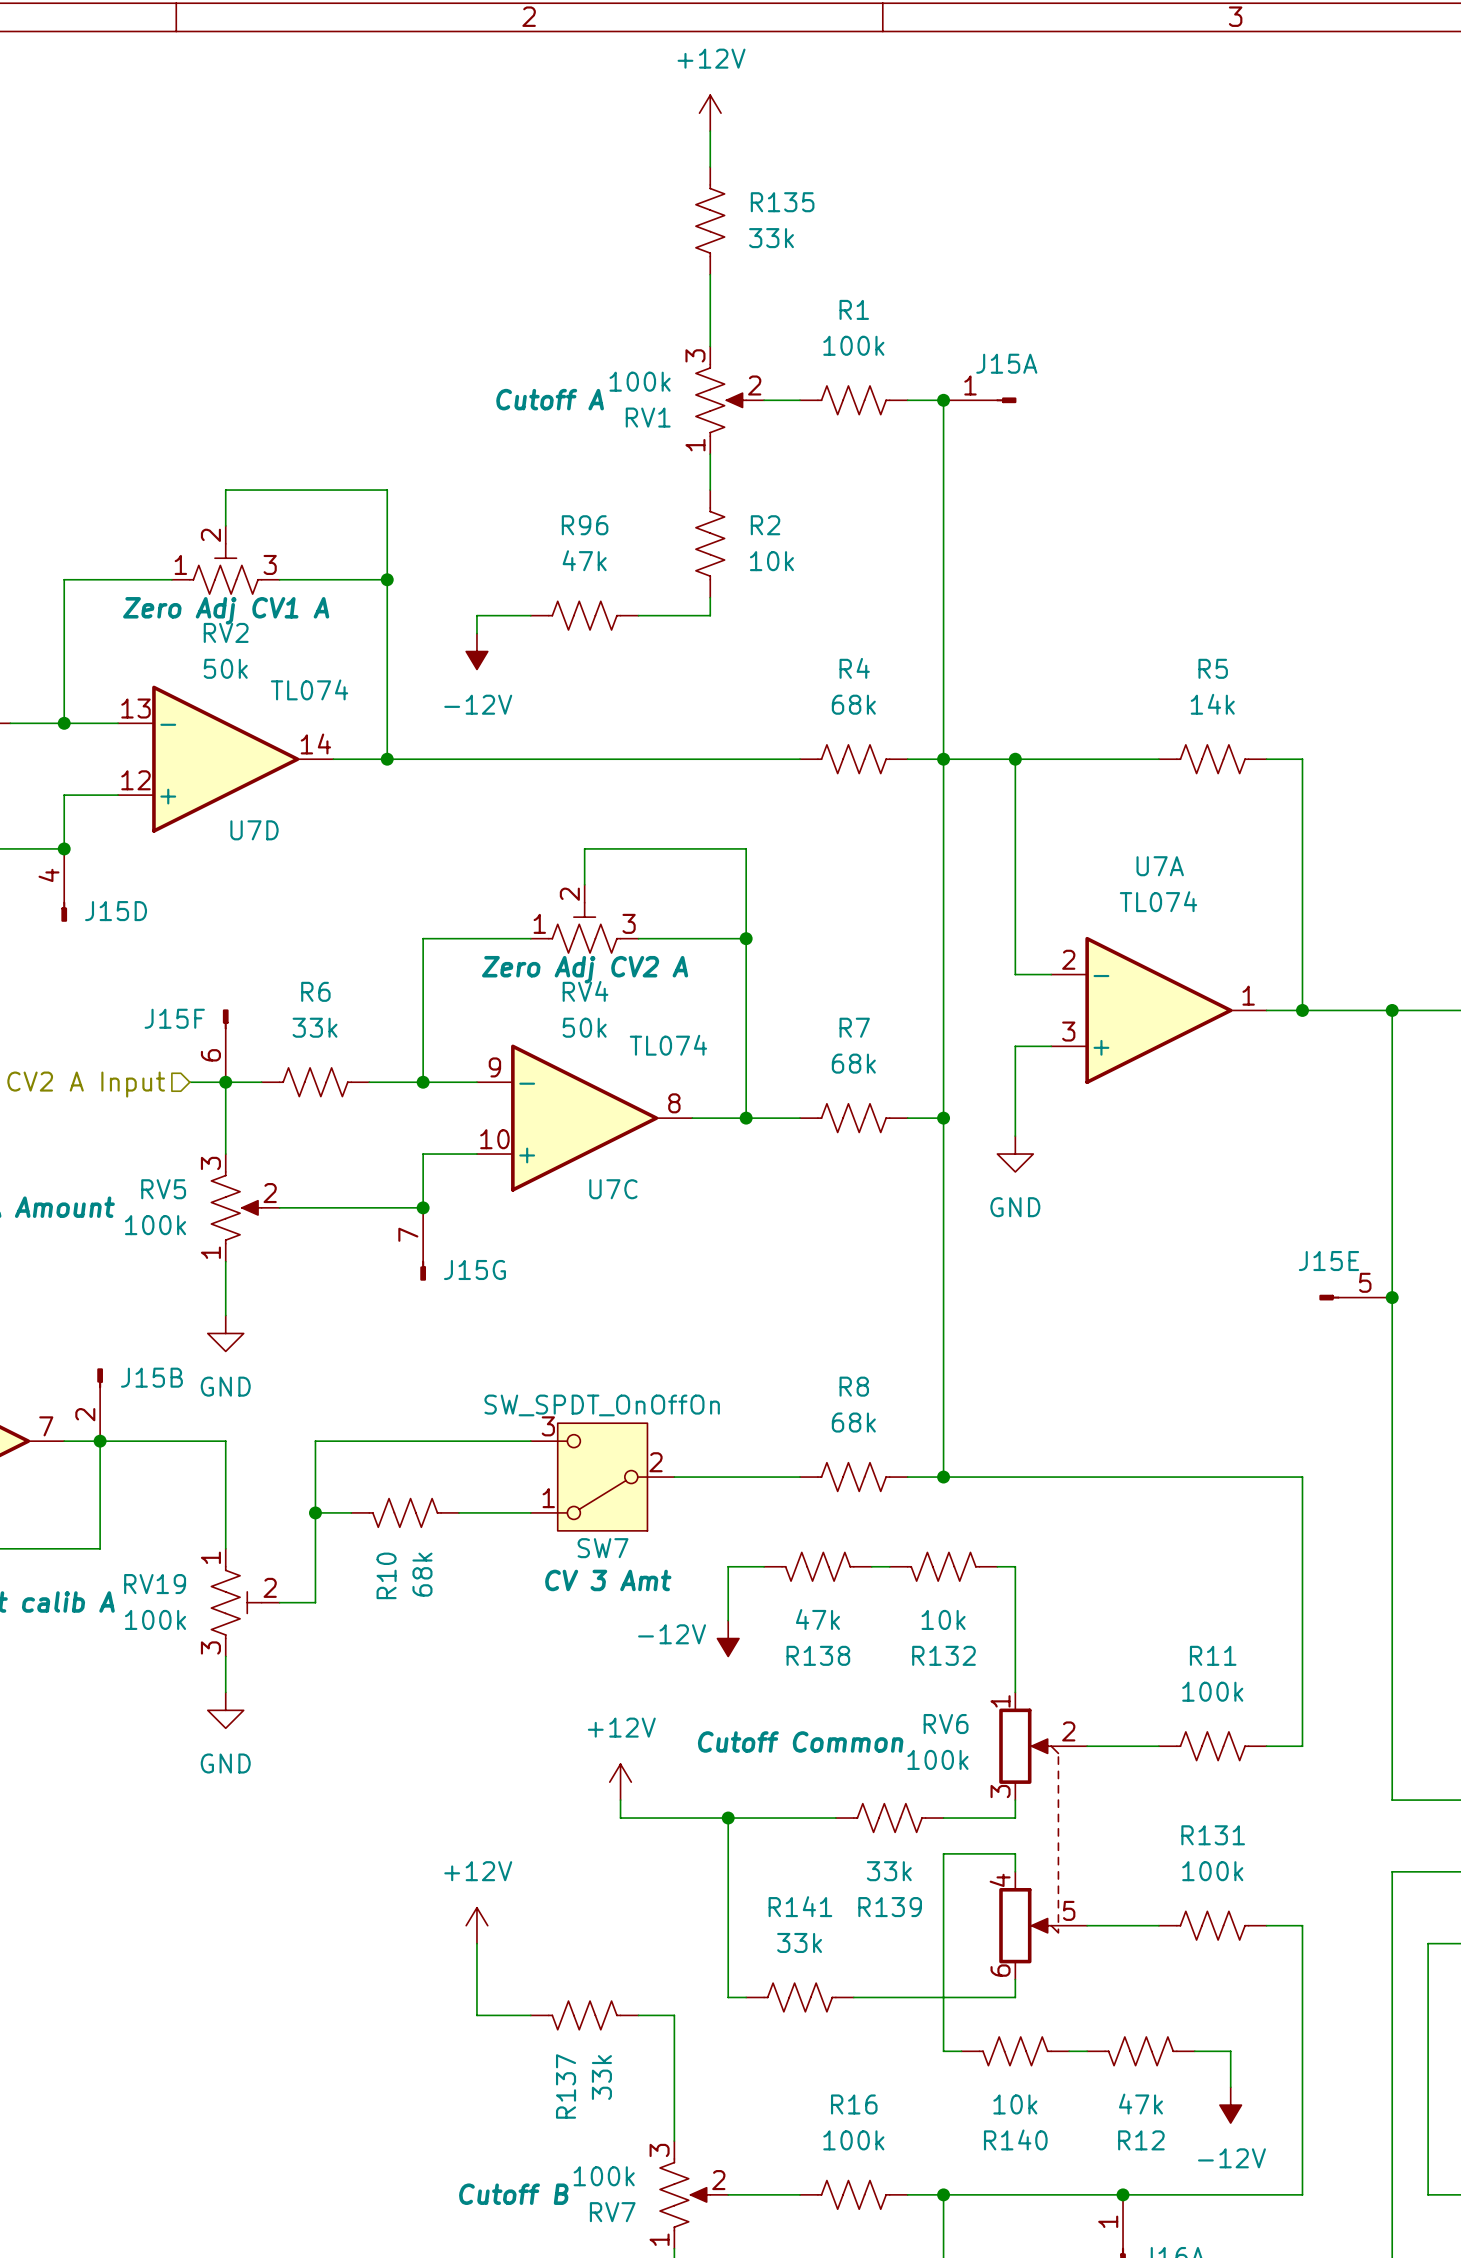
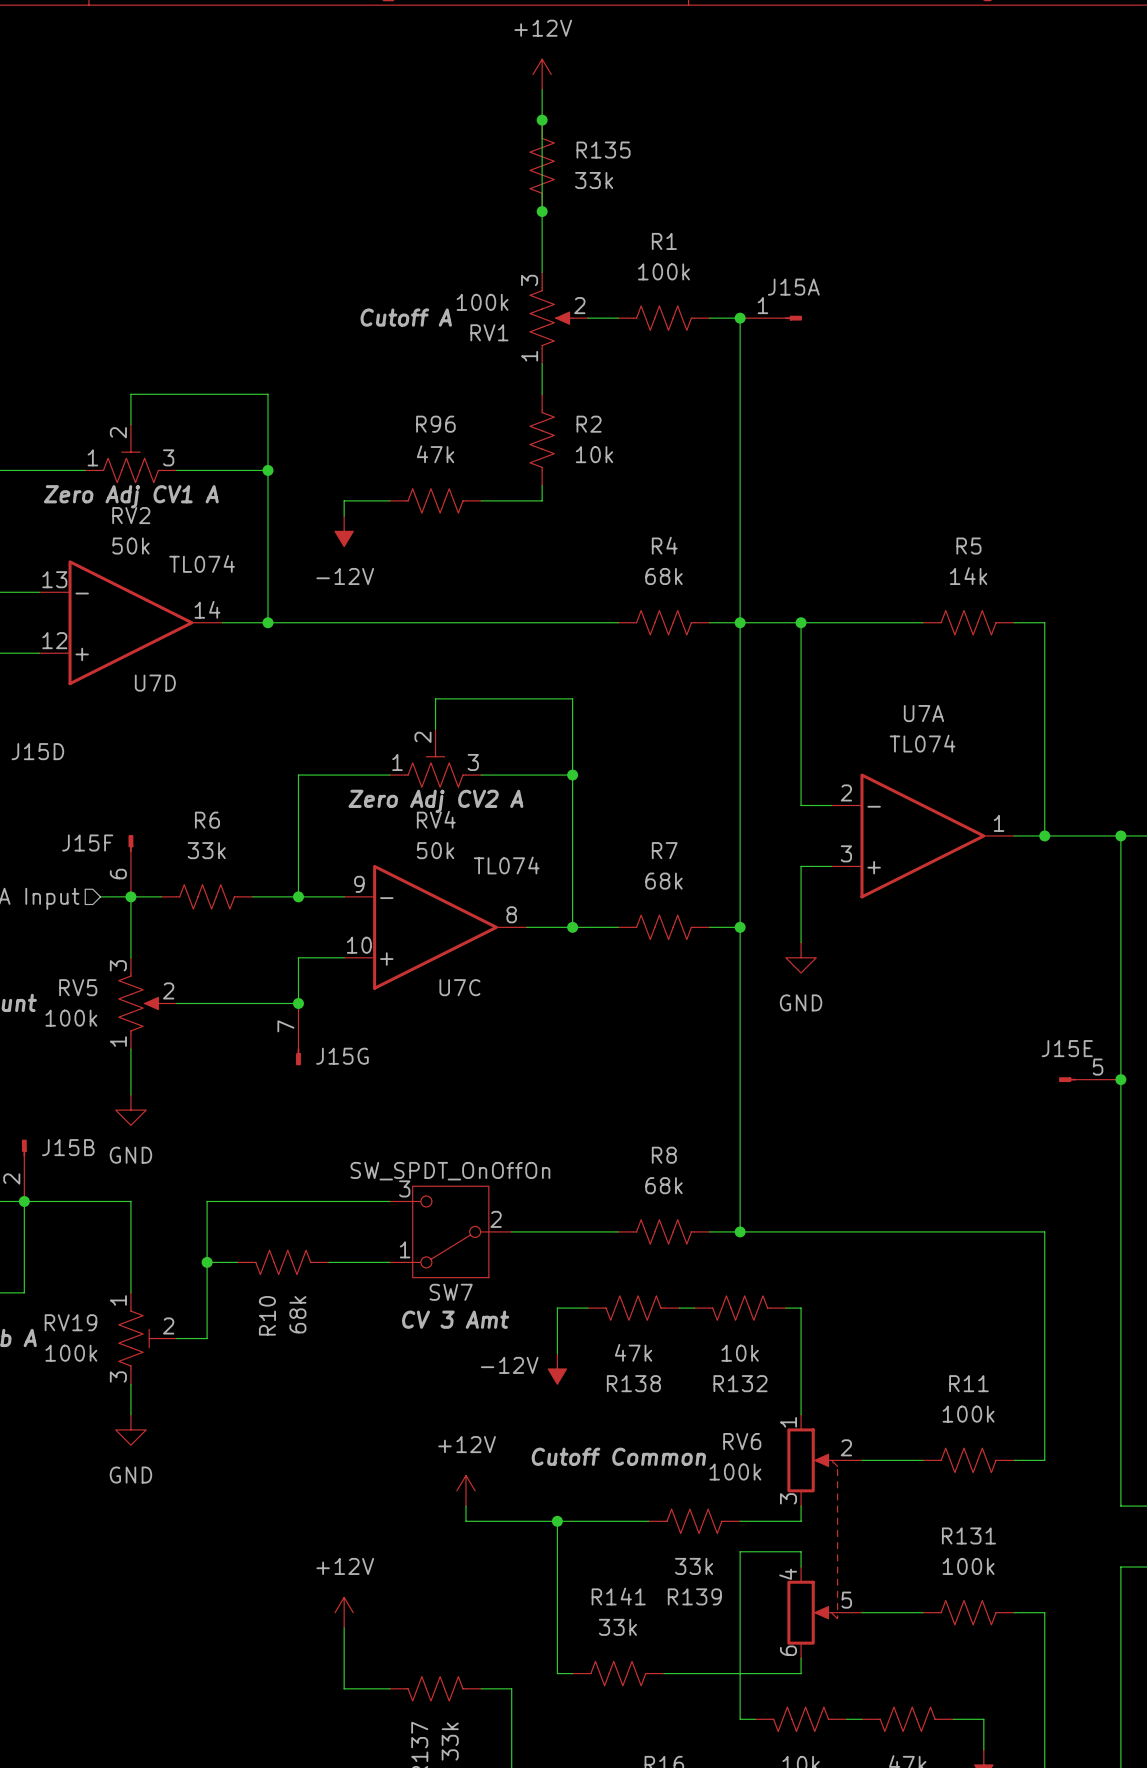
wire: none -> (542, 120) (542, 211)
junction: none -> (542, 120)
junction: none -> (542, 211)

